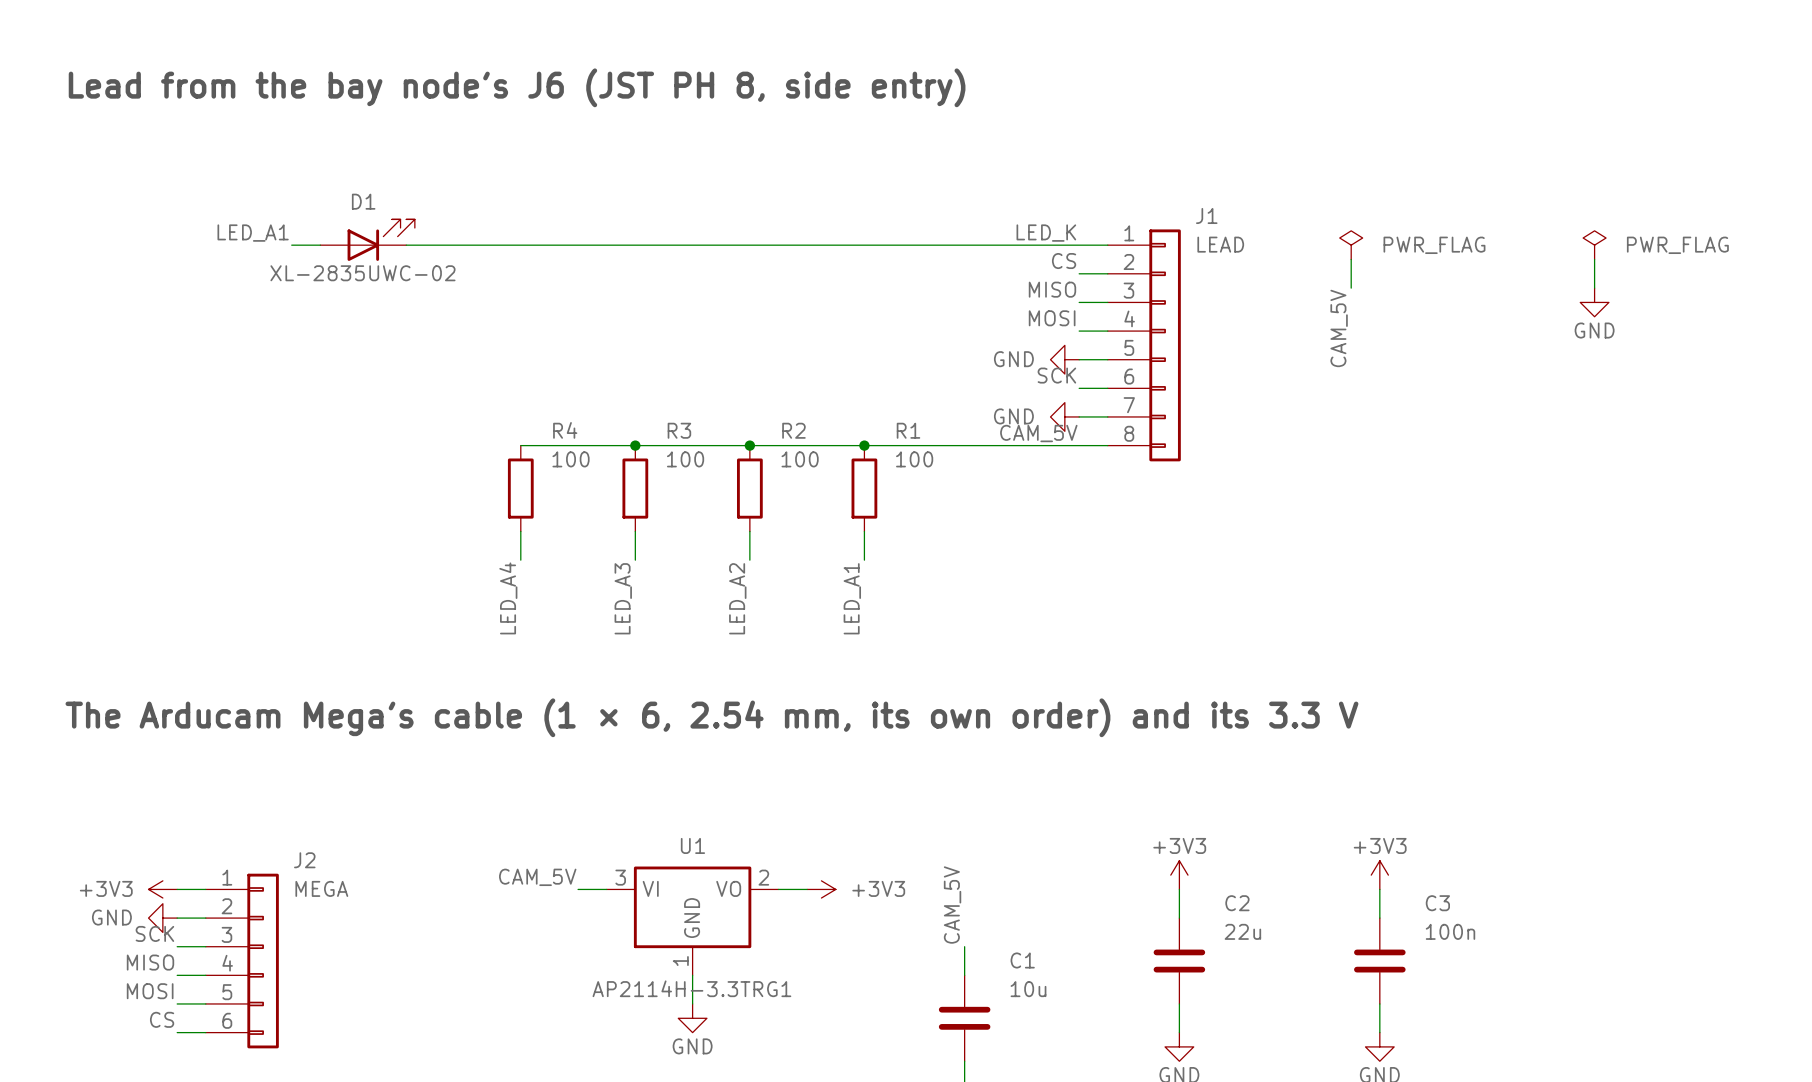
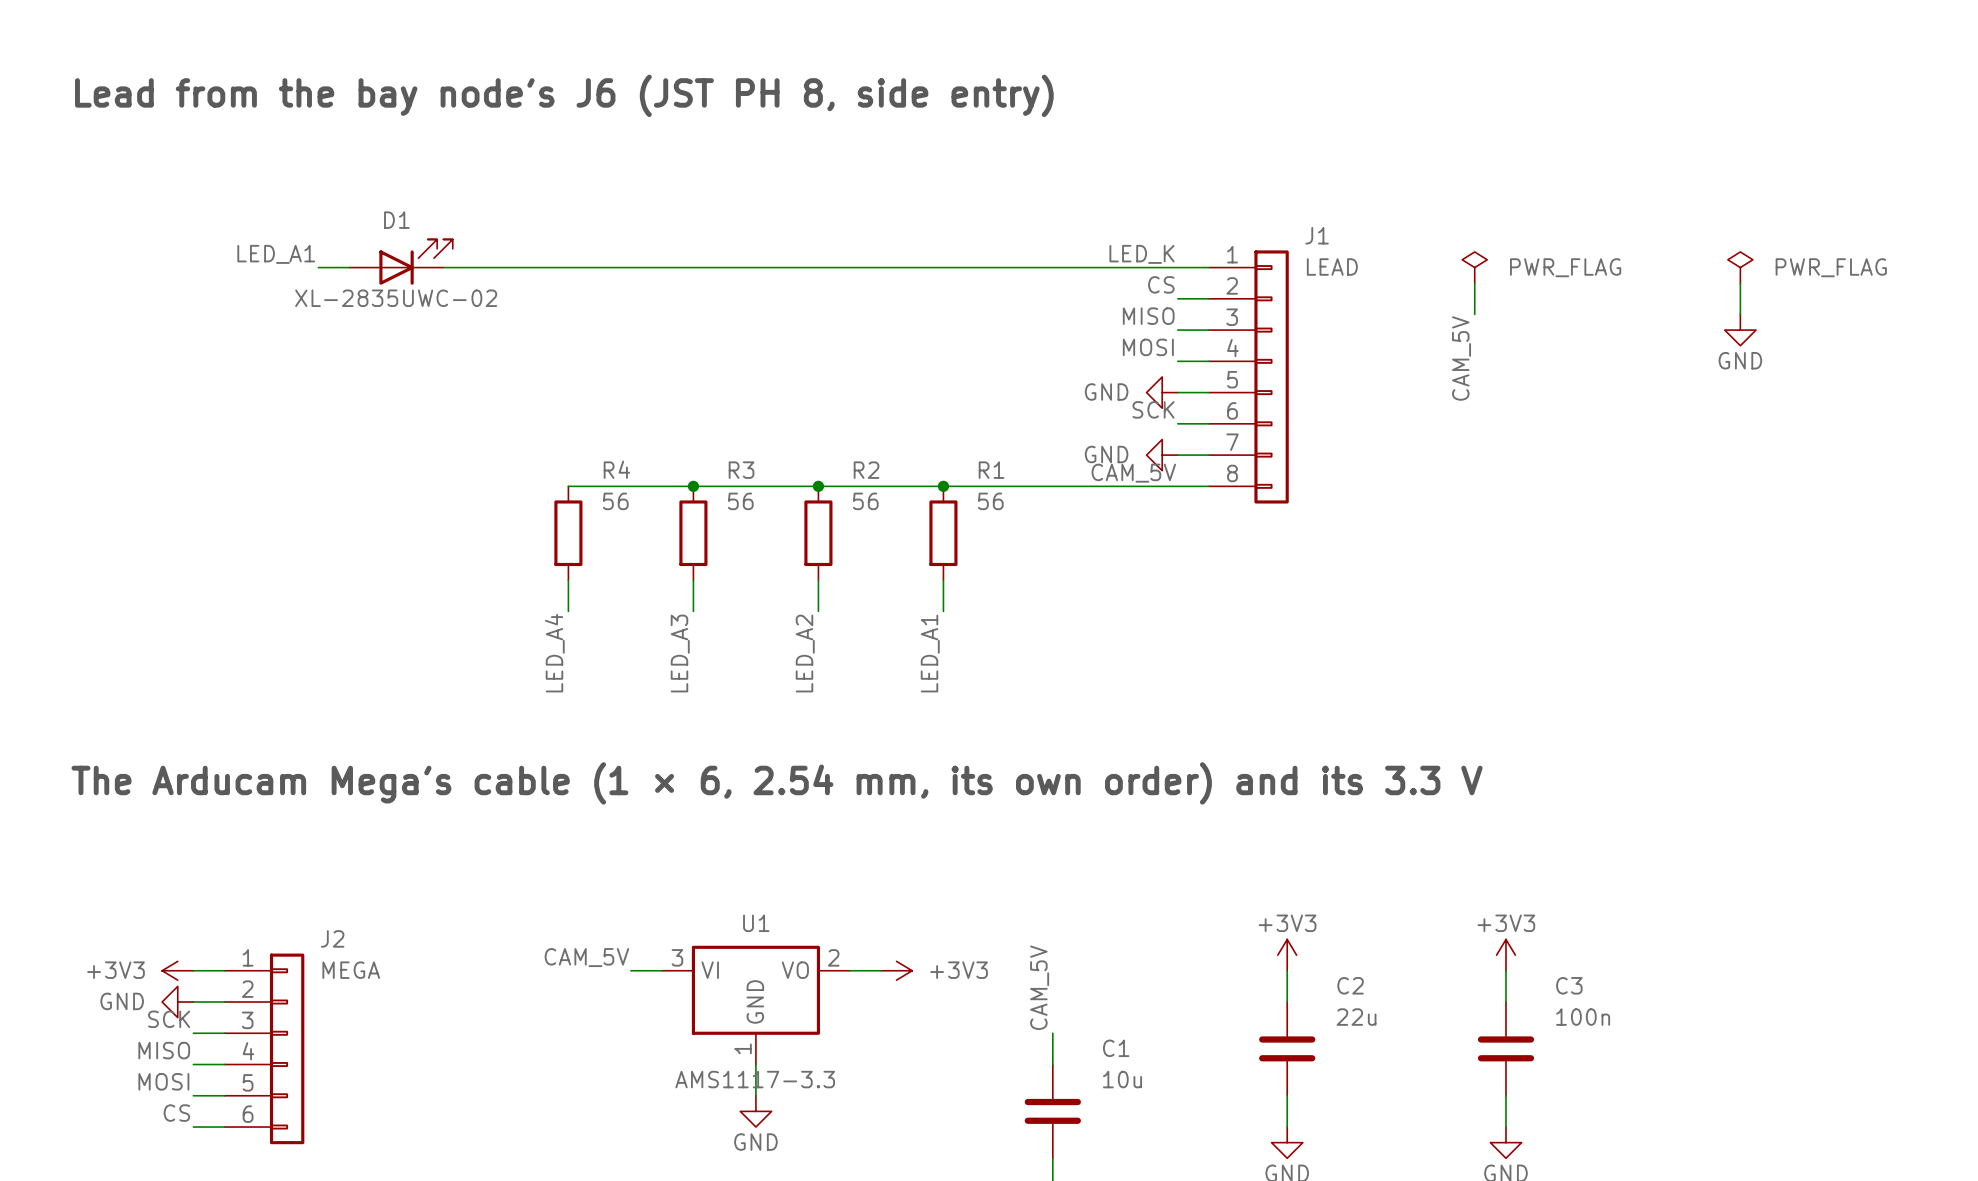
R4 value: 100 (571, 459) -> 56 (615, 501)
R3 value: 100 (685, 459) -> 56 (740, 501)
R2 value: 100 (800, 459) -> 56 (865, 501)
R1 value: 100 (914, 459) -> 56 (990, 501)
U1 value: AP2114H-3.3TRG1 (691, 988) -> AMS1117-3.3 (755, 1079)

